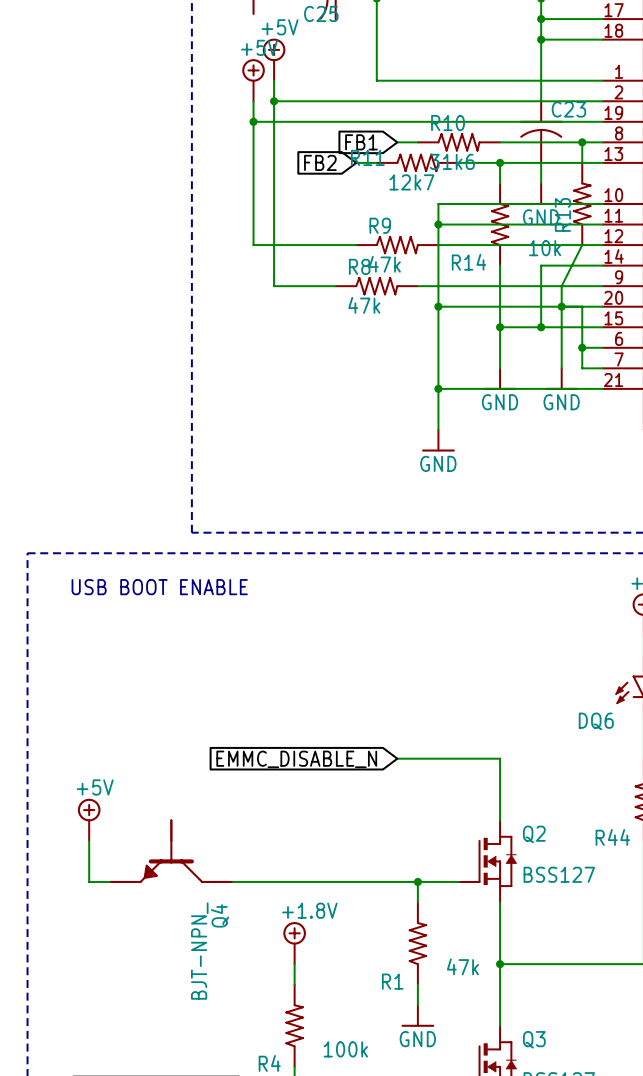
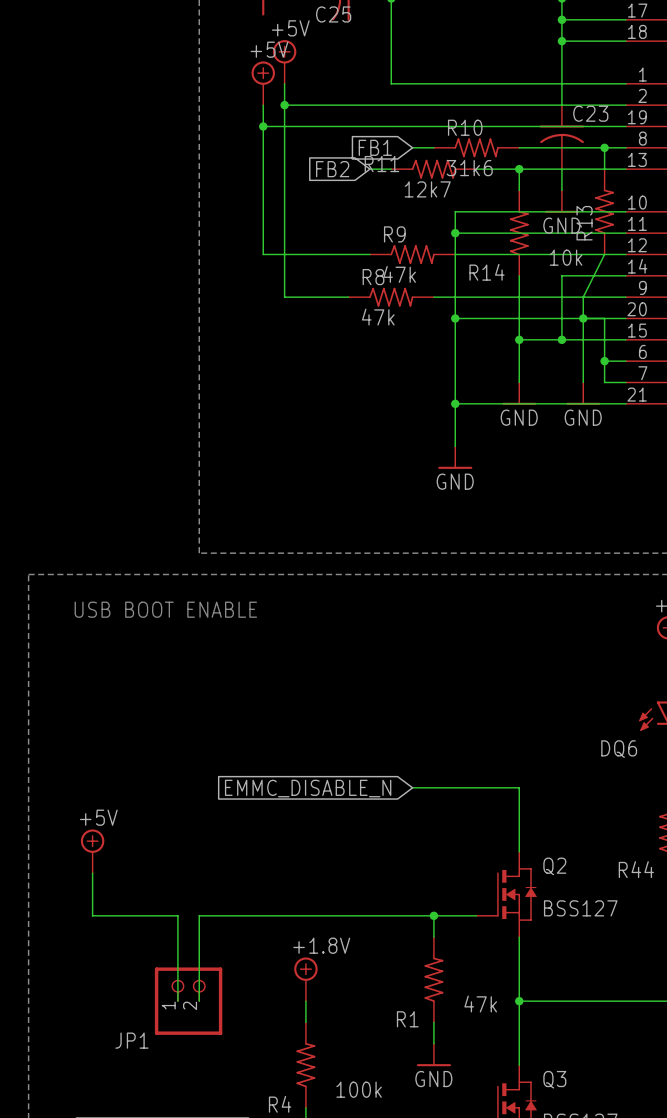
Q4: BJT-NPN_ (171, 851) -> none
wire: none -> (113, 915) (177, 915) (177, 1001)
wire: none -> (241, 915) (199, 915) (199, 1001)
JP1: none -> (188, 1001)

